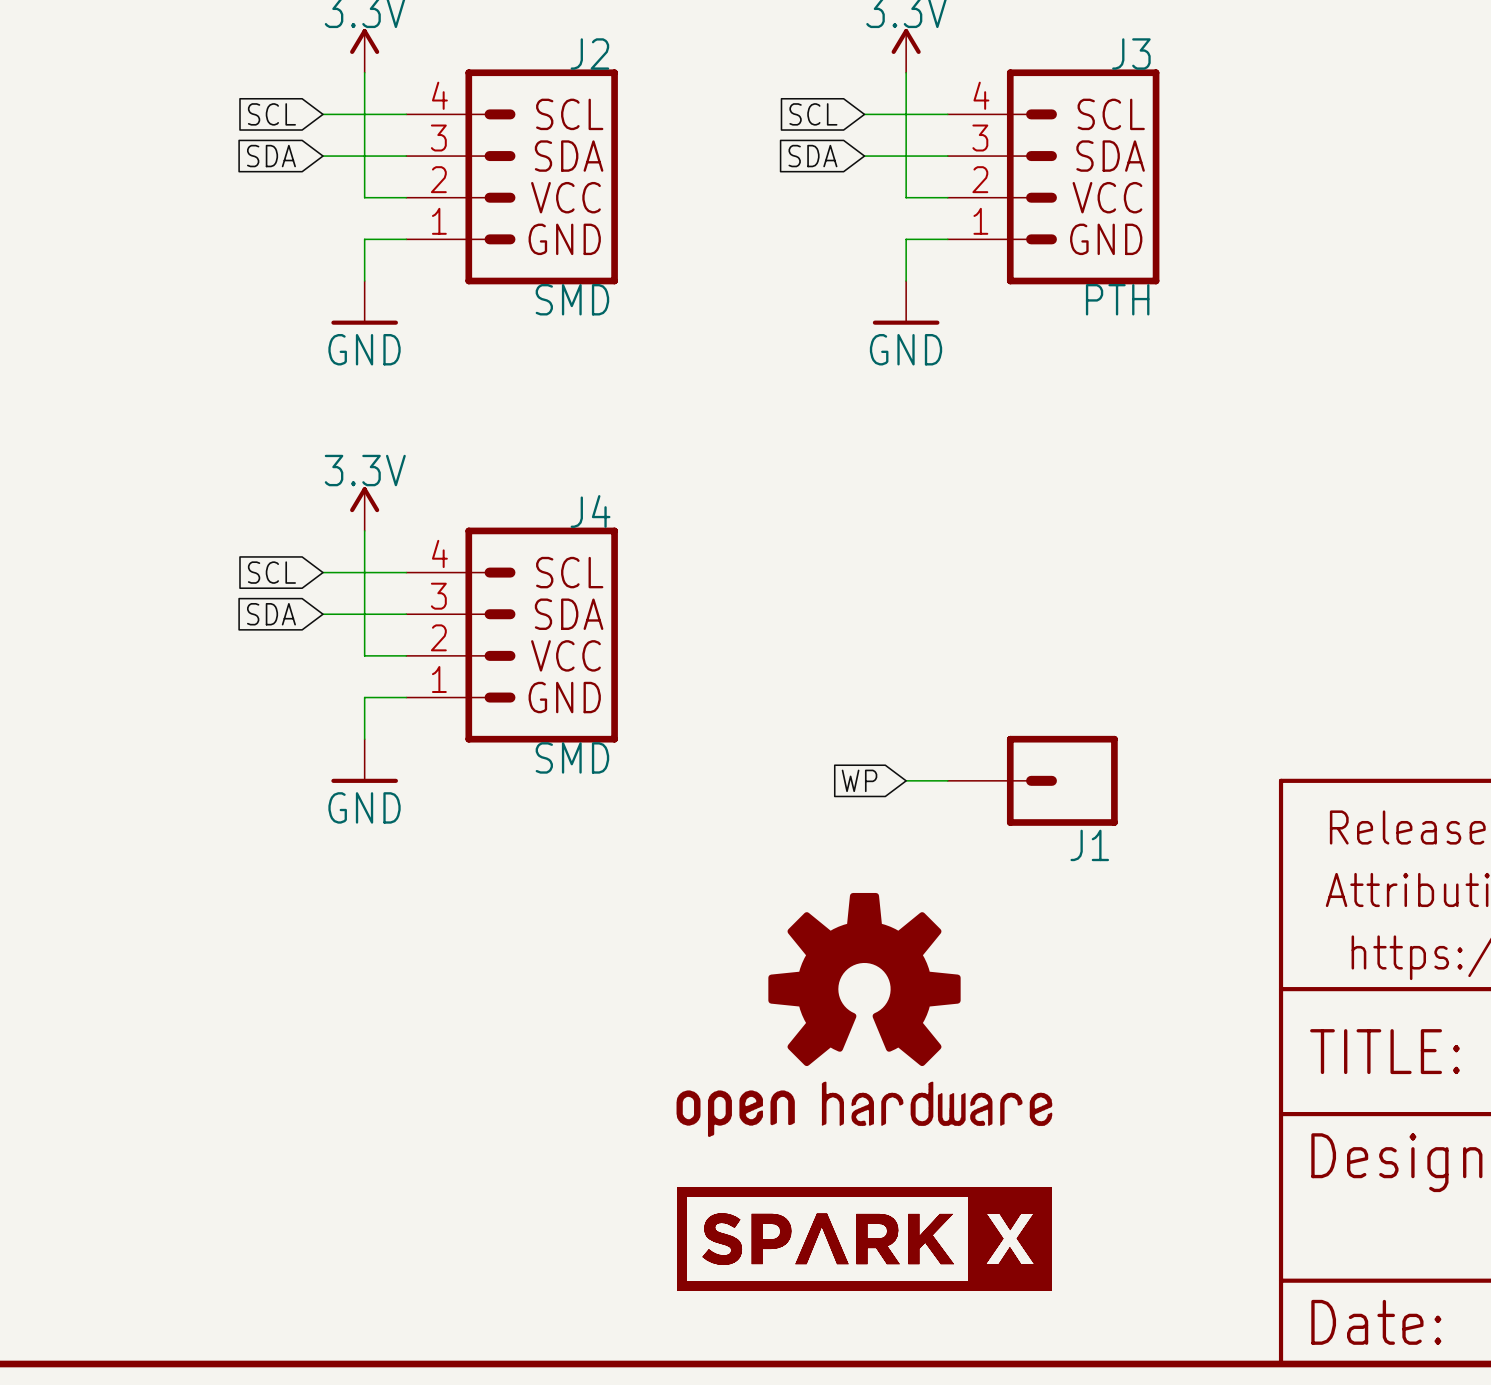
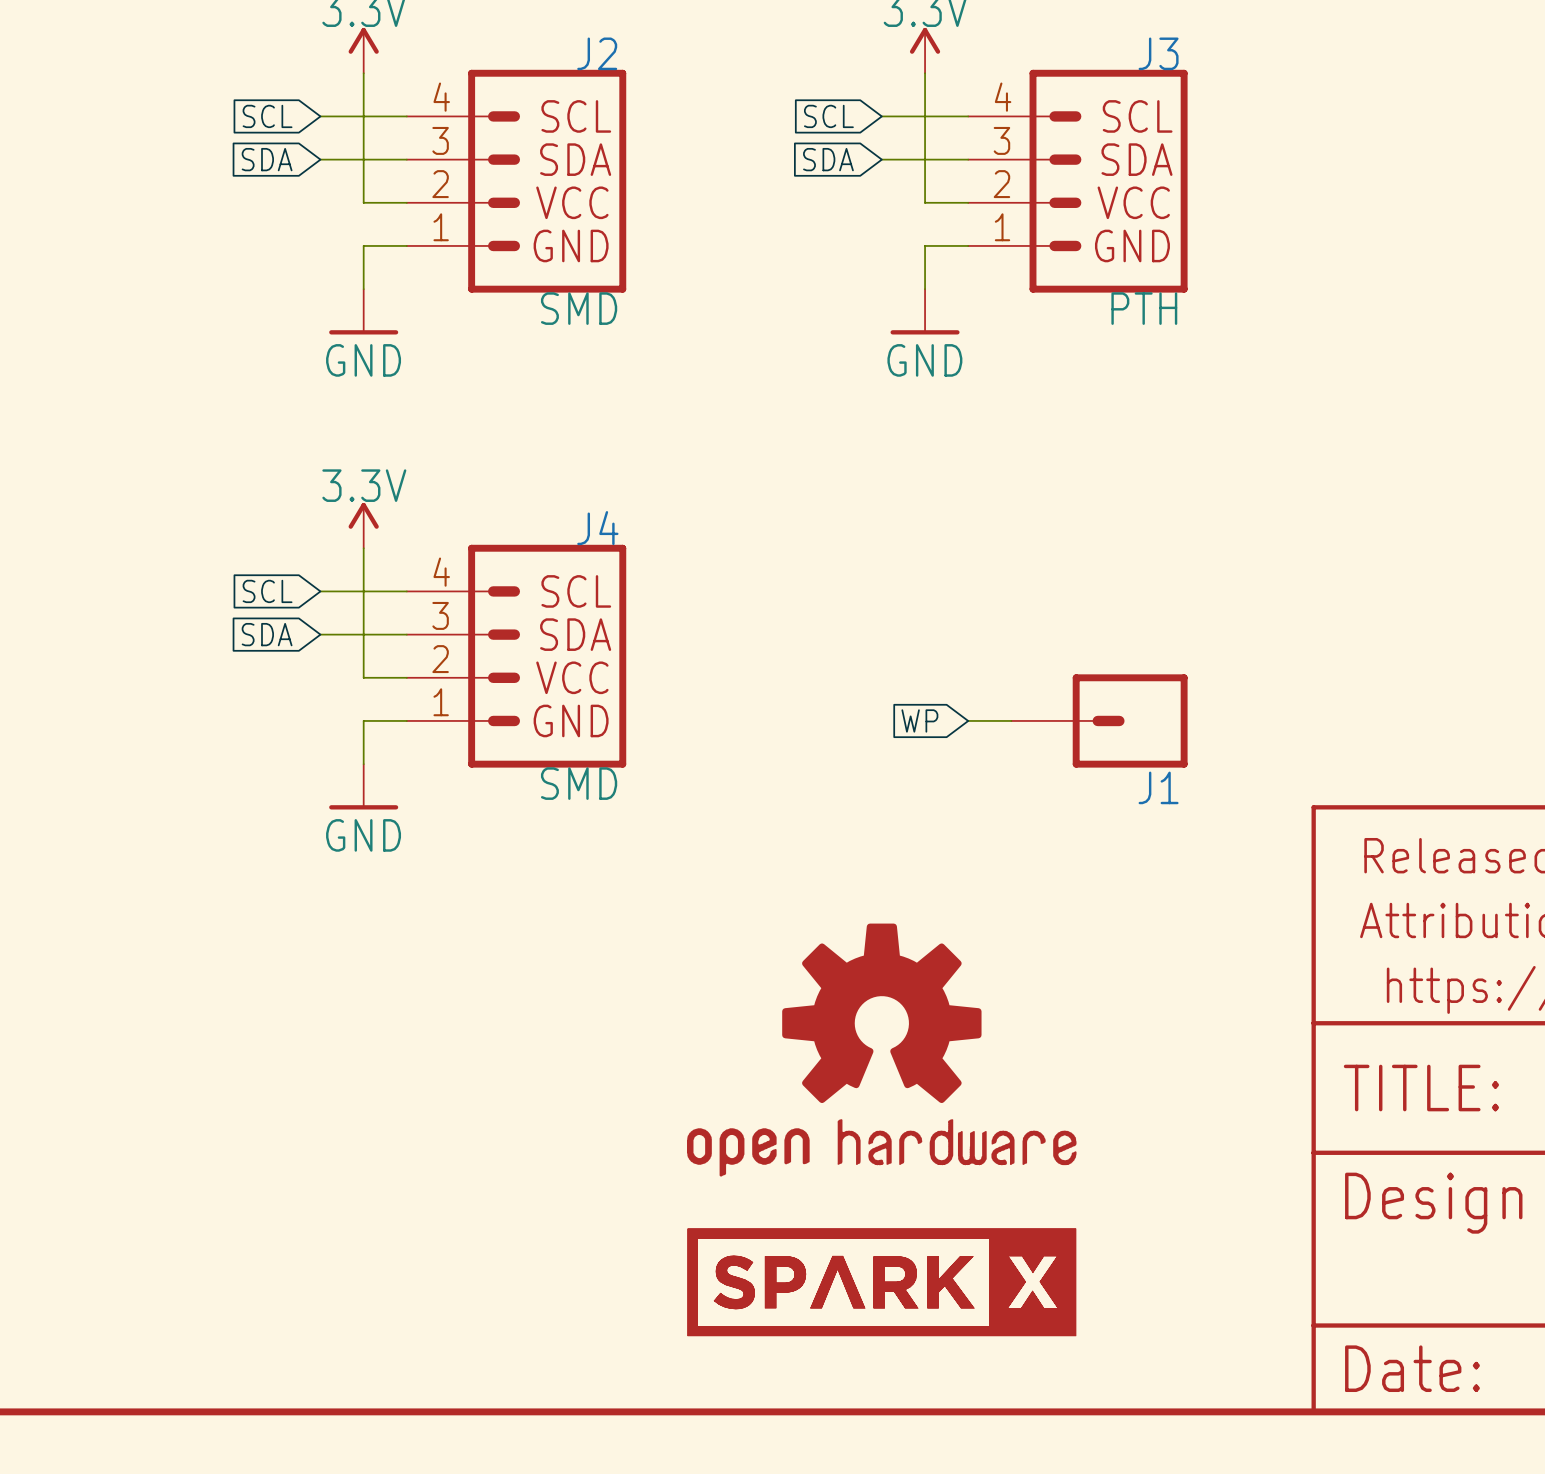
global label position: WP (859, 780) -> WP (919, 720)
wire: (906, 780) (947, 780) -> (968, 720) (1011, 720)
J1 position: (1032, 780) -> (1099, 720)

